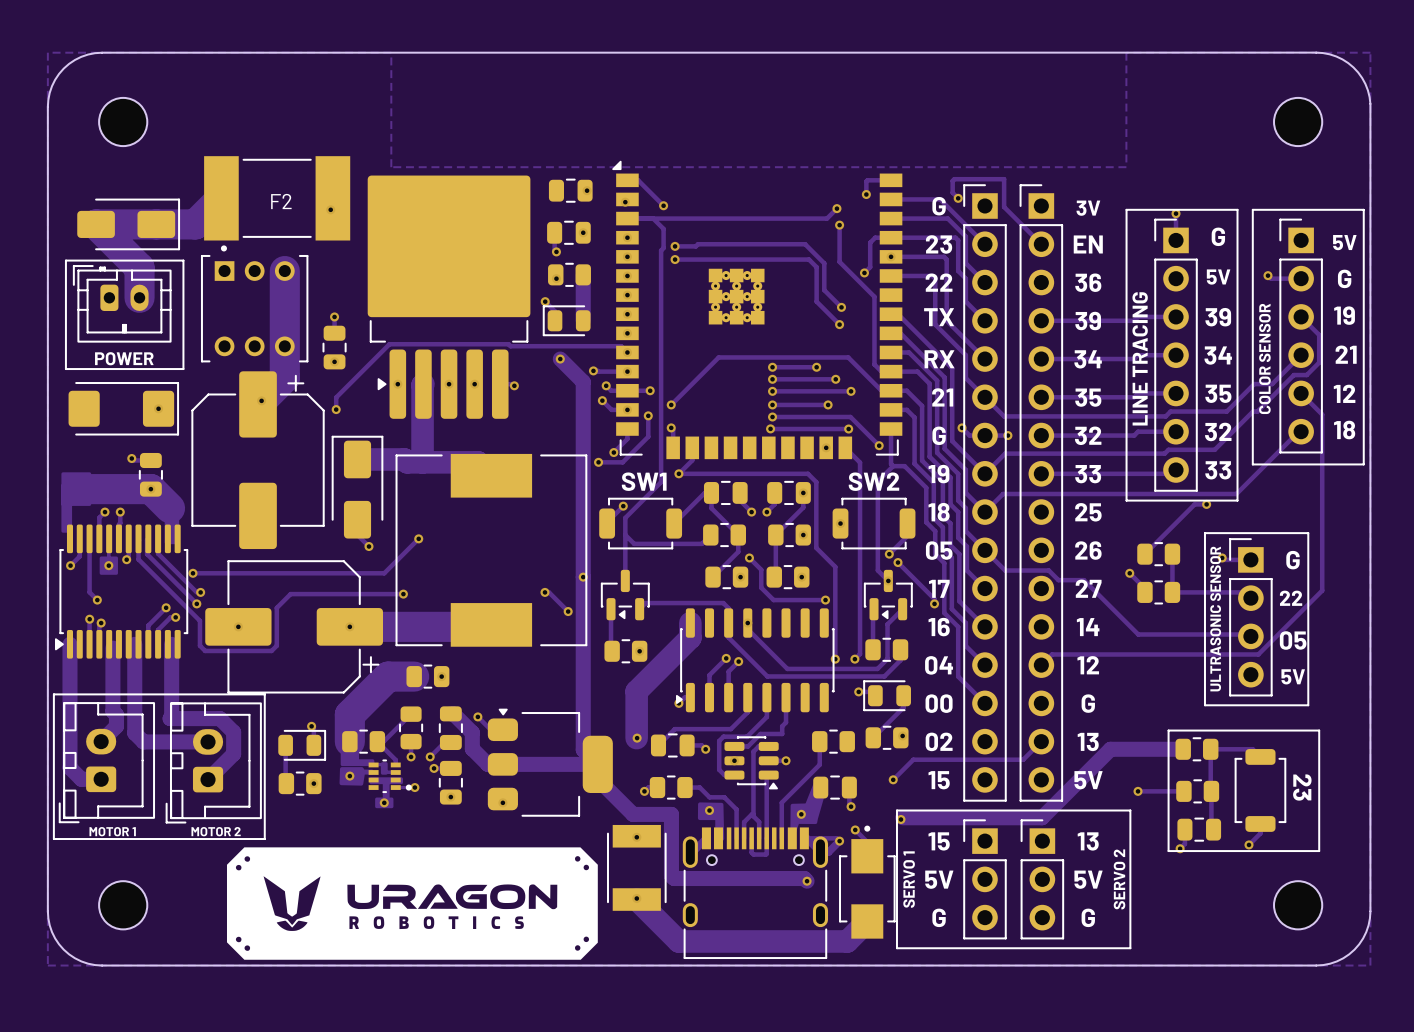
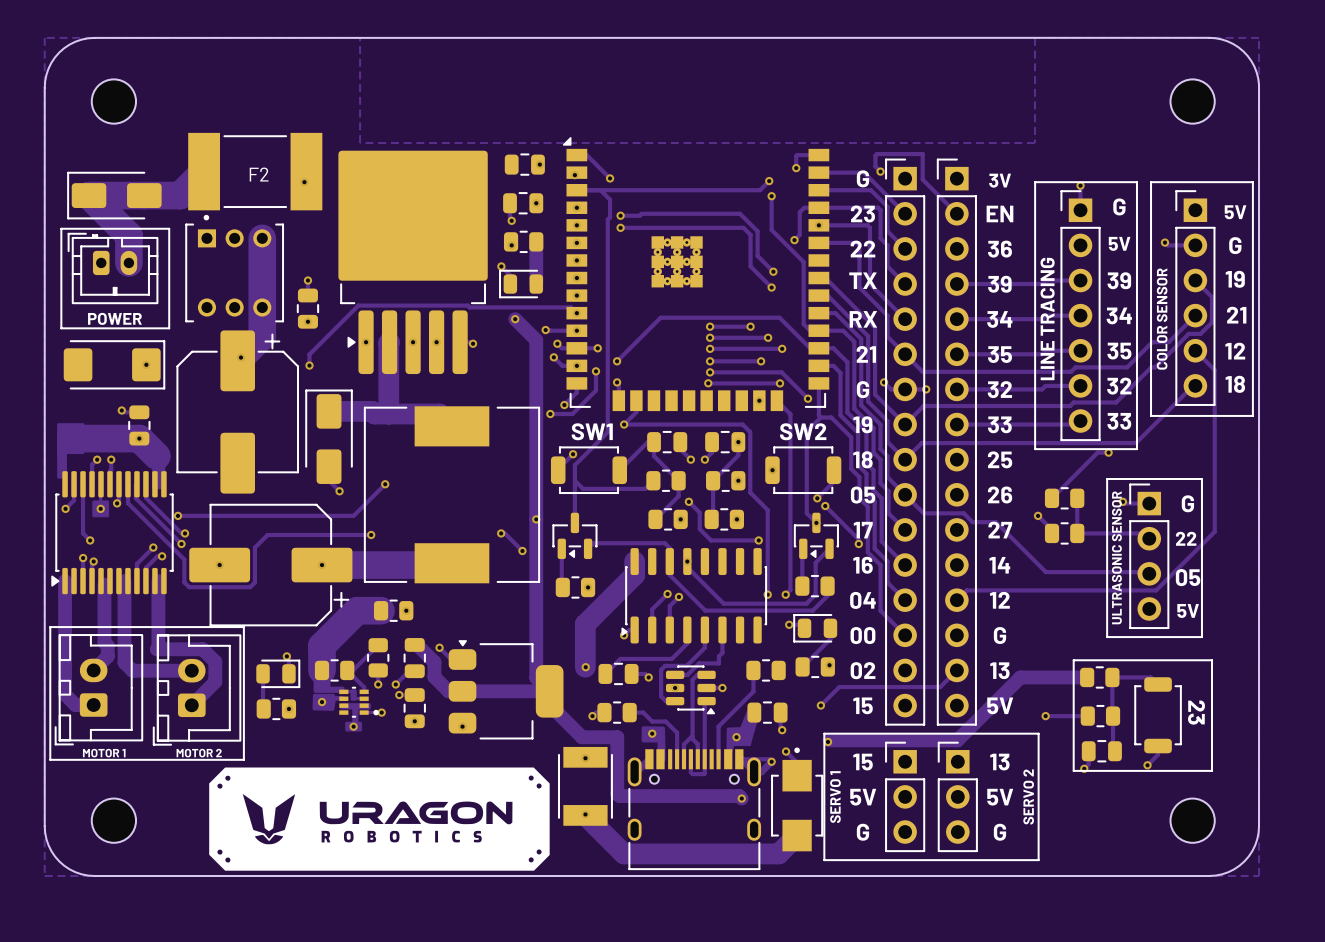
part rotation: 0° (128, 224) -> 180° (114, 195)

